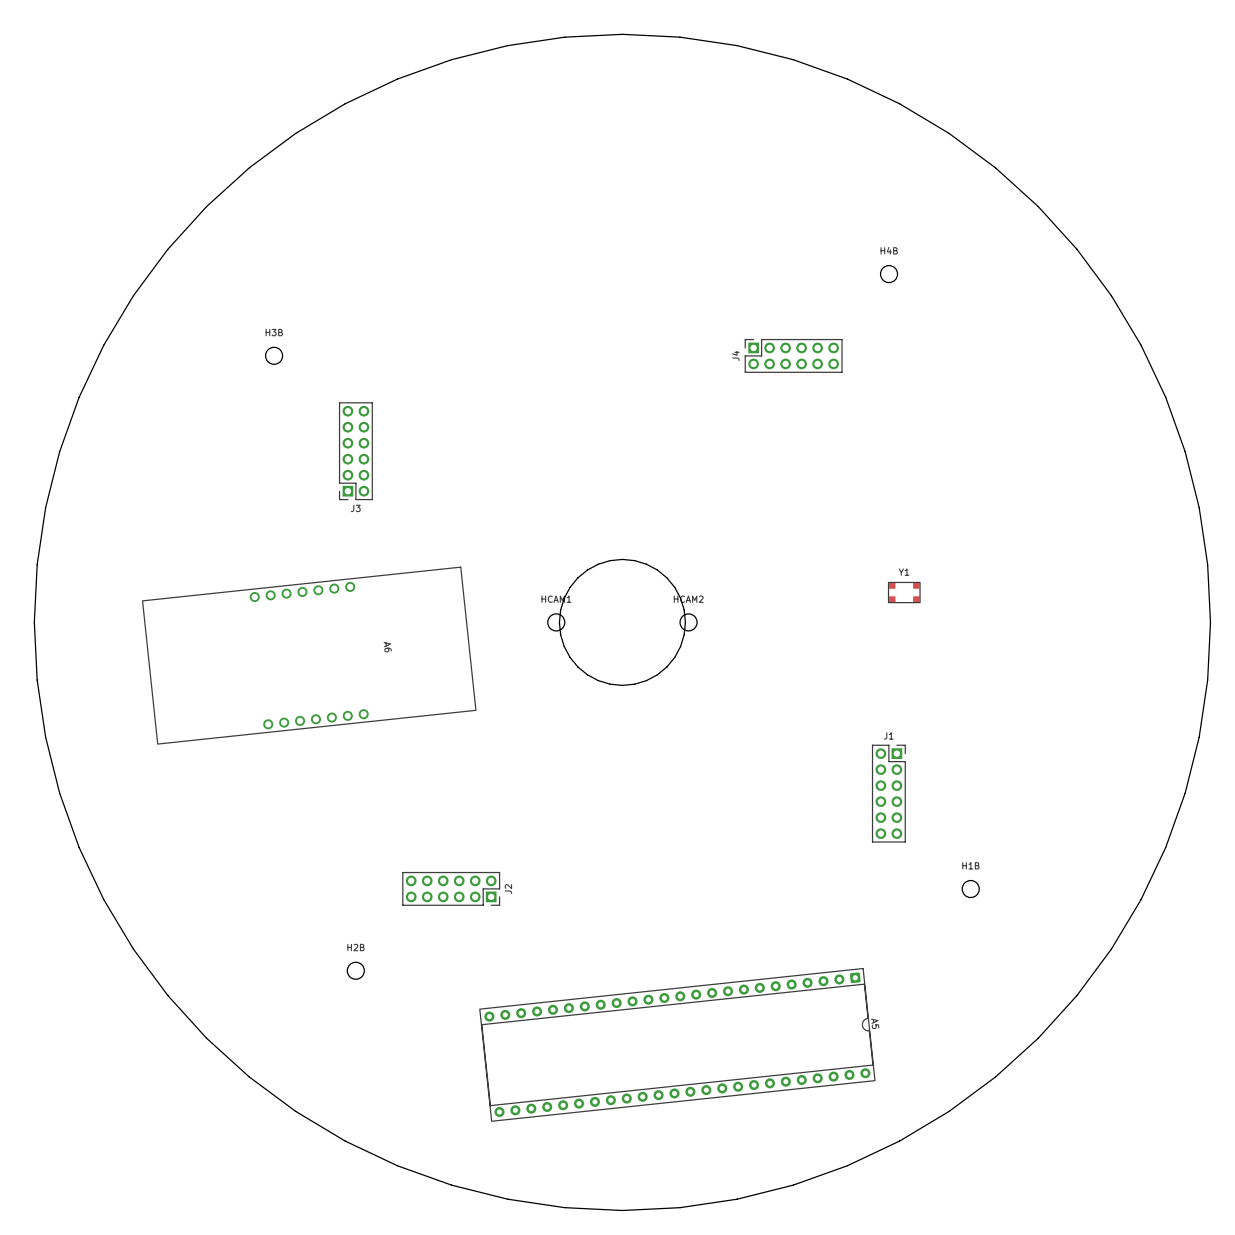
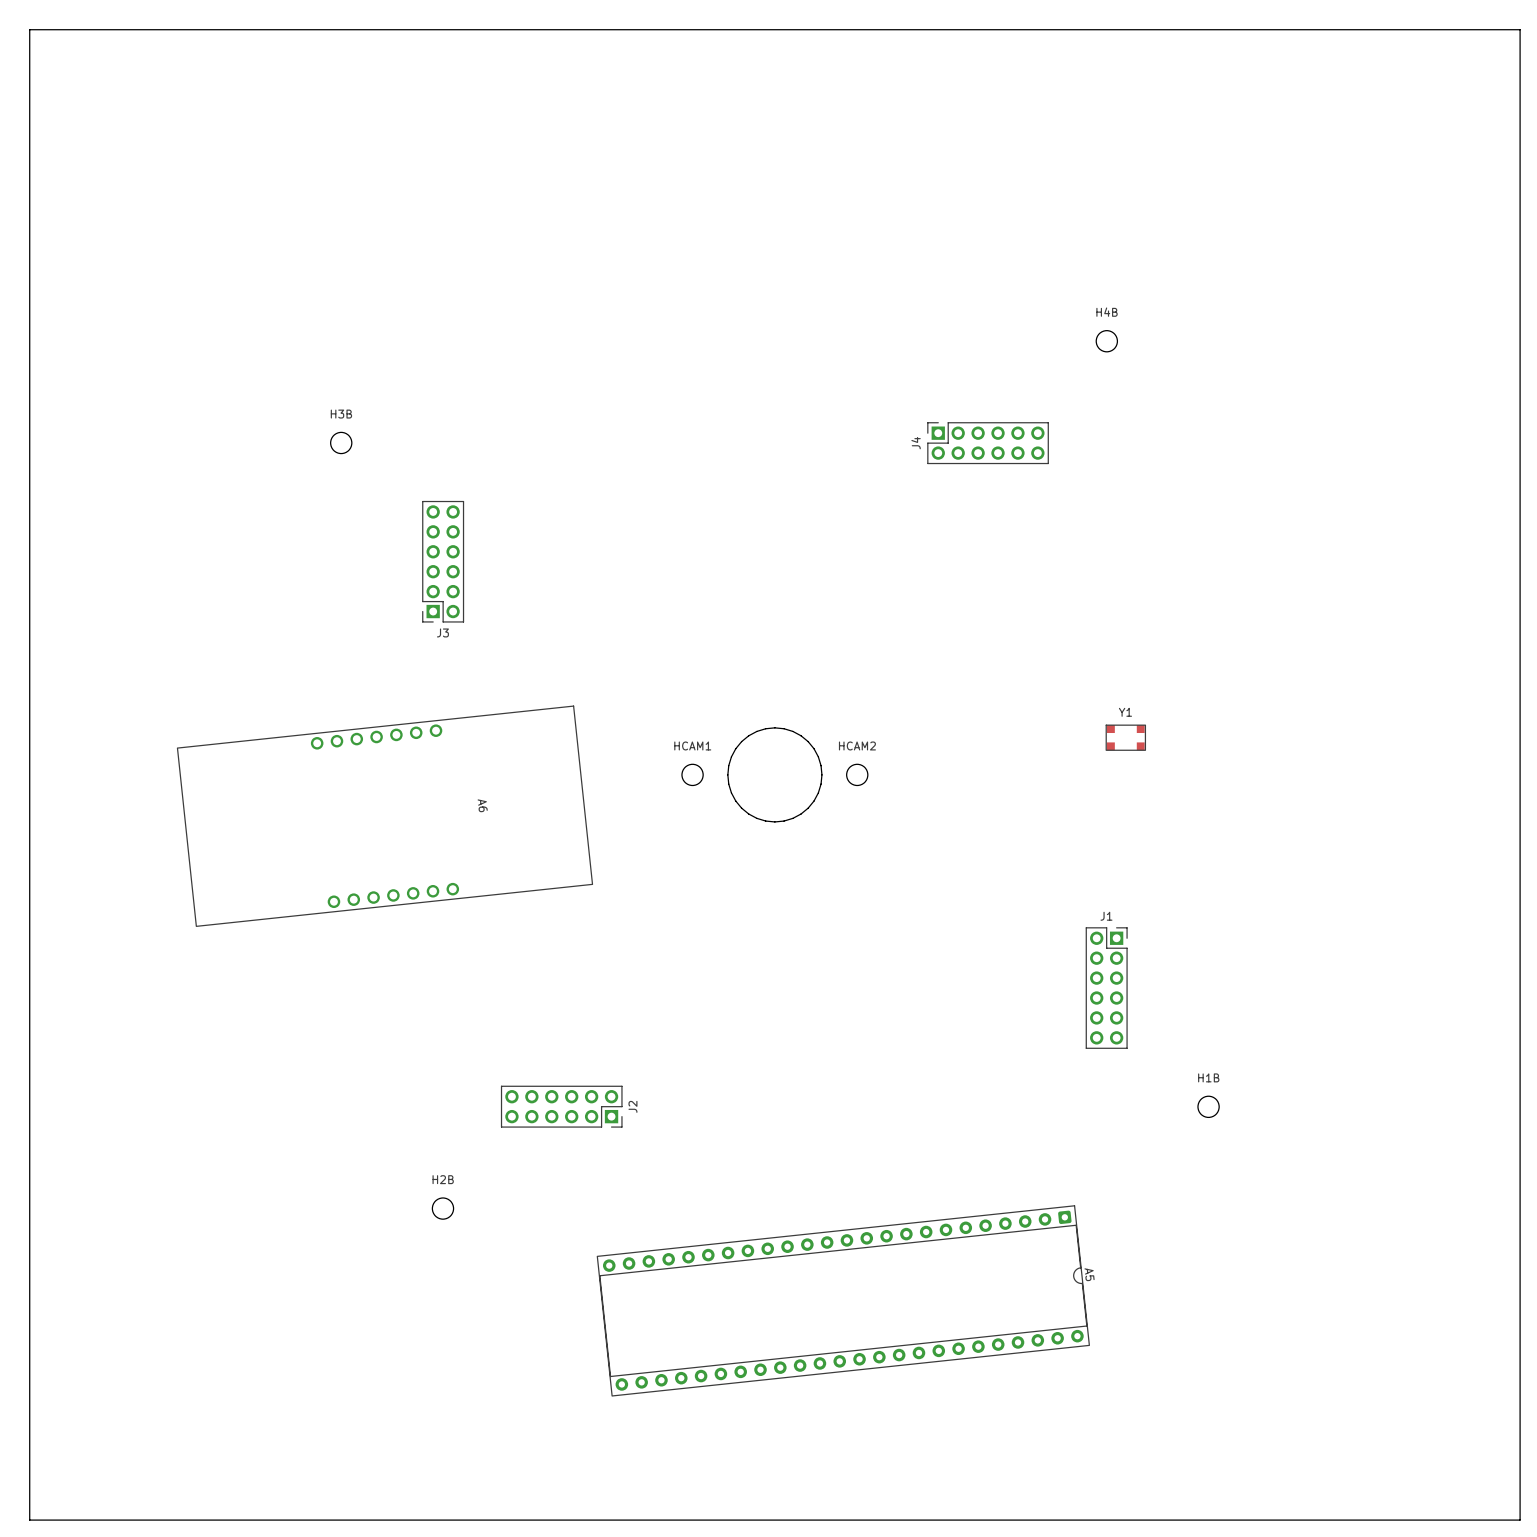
board edge: (622, 34) (564, 37) (507, 45) (451, 59) (397, 79) (345, 103) (295, 133) (249, 167) (206, 206) (167, 249) (133, 295) (103, 345) (79, 397) (59, 451) (45, 507) (37, 564) (34, 622) (37, 680) (45, 737) (59, 793) (79, 847) (103, 899) (133, 949) (167, 995) (206, 1038) (249, 1077) (295, 1111) (345, 1141) (397, 1165) (451, 1185) (507, 1199) (564, 1207) (622, 1210) (680, 1207) (737, 1199) (793, 1185) (847, 1165) (899, 1141) (949, 1111) (995, 1077) (1038, 1038) (1077, 995) (1111, 949) (1141, 899) (1165, 847) (1185, 793) (1199, 737) (1207, 680) (1210, 622) (1207, 564) (1199, 507) (1185, 451) (1165, 397) (1141, 345) (1111, 295) (1077, 249) (1038, 206) (995, 167) (949, 133) (899, 103) (847, 79) (793, 59) (737, 45) (680, 37) (622, 34) -> (29, 29) (29, 1520) (1520, 1520) (1520, 29) (29, 29)
board edge: (622, 559) (598, 564) (577, 577) (564, 598) (559, 622) (564, 646) (577, 666) (598, 680) (622, 685) (646, 680) (666, 666) (680, 646) (685, 622) (680, 598) (666, 577) (646, 564) (622, 559) -> none
board edge: none -> (774, 727) (756, 731) (741, 741) (731, 756) (727, 774) (731, 792) (741, 808) (756, 818) (774, 821) (792, 818) (808, 808) (818, 792) (821, 774) (818, 756) (808, 741) (792, 731) (774, 727)

